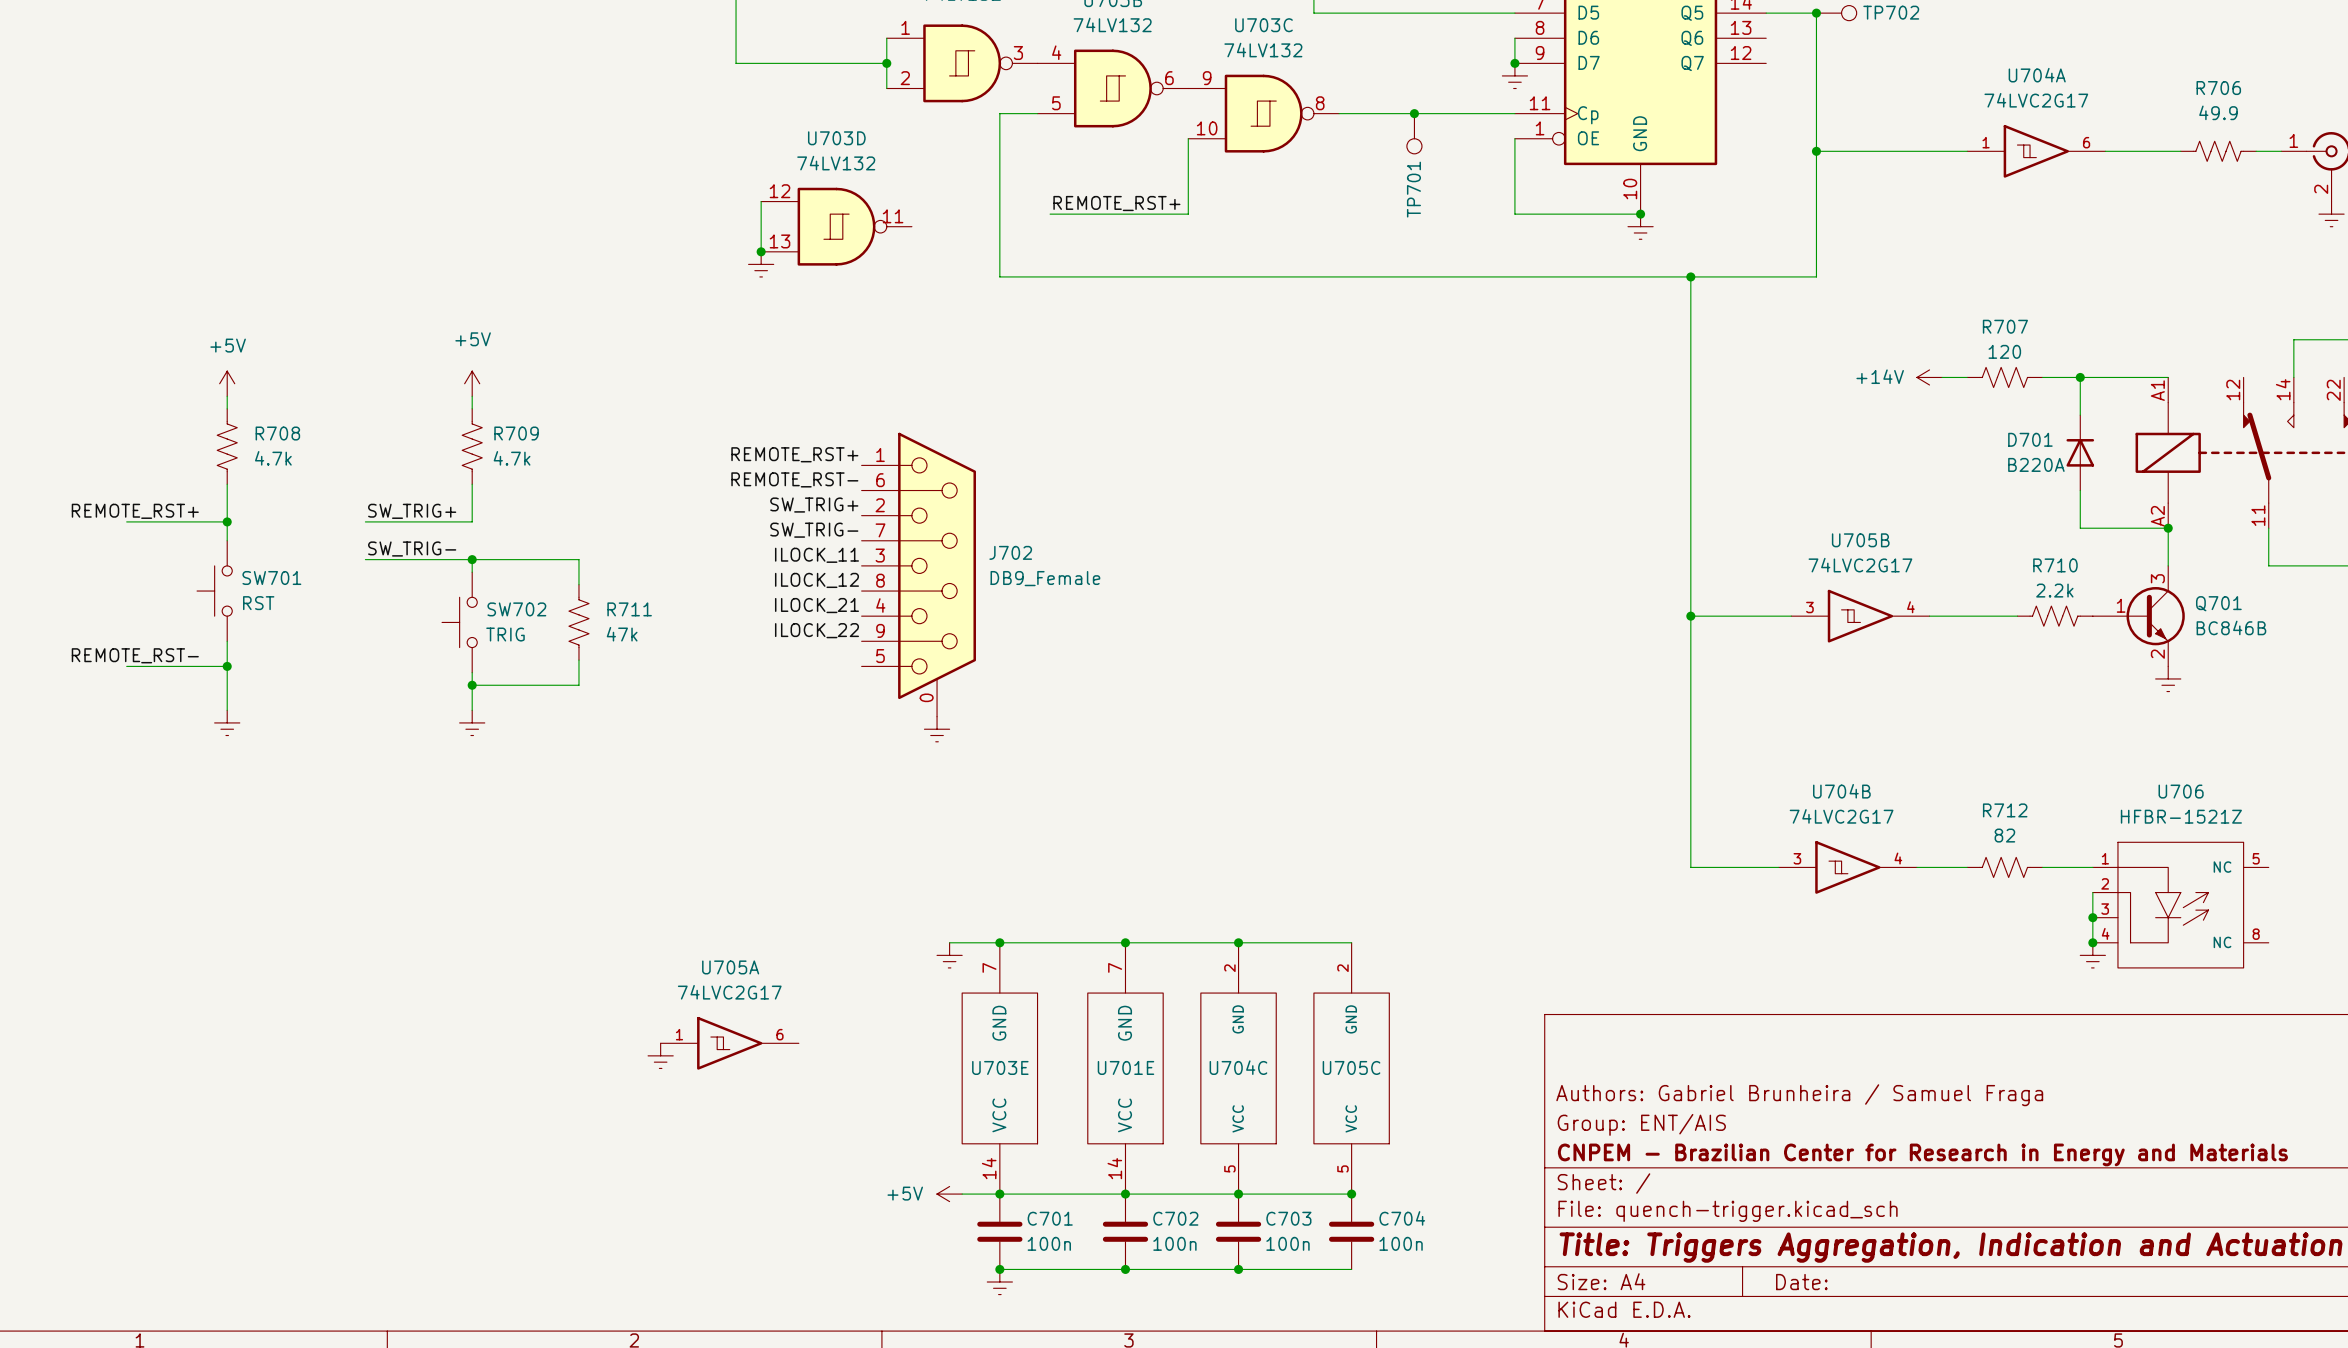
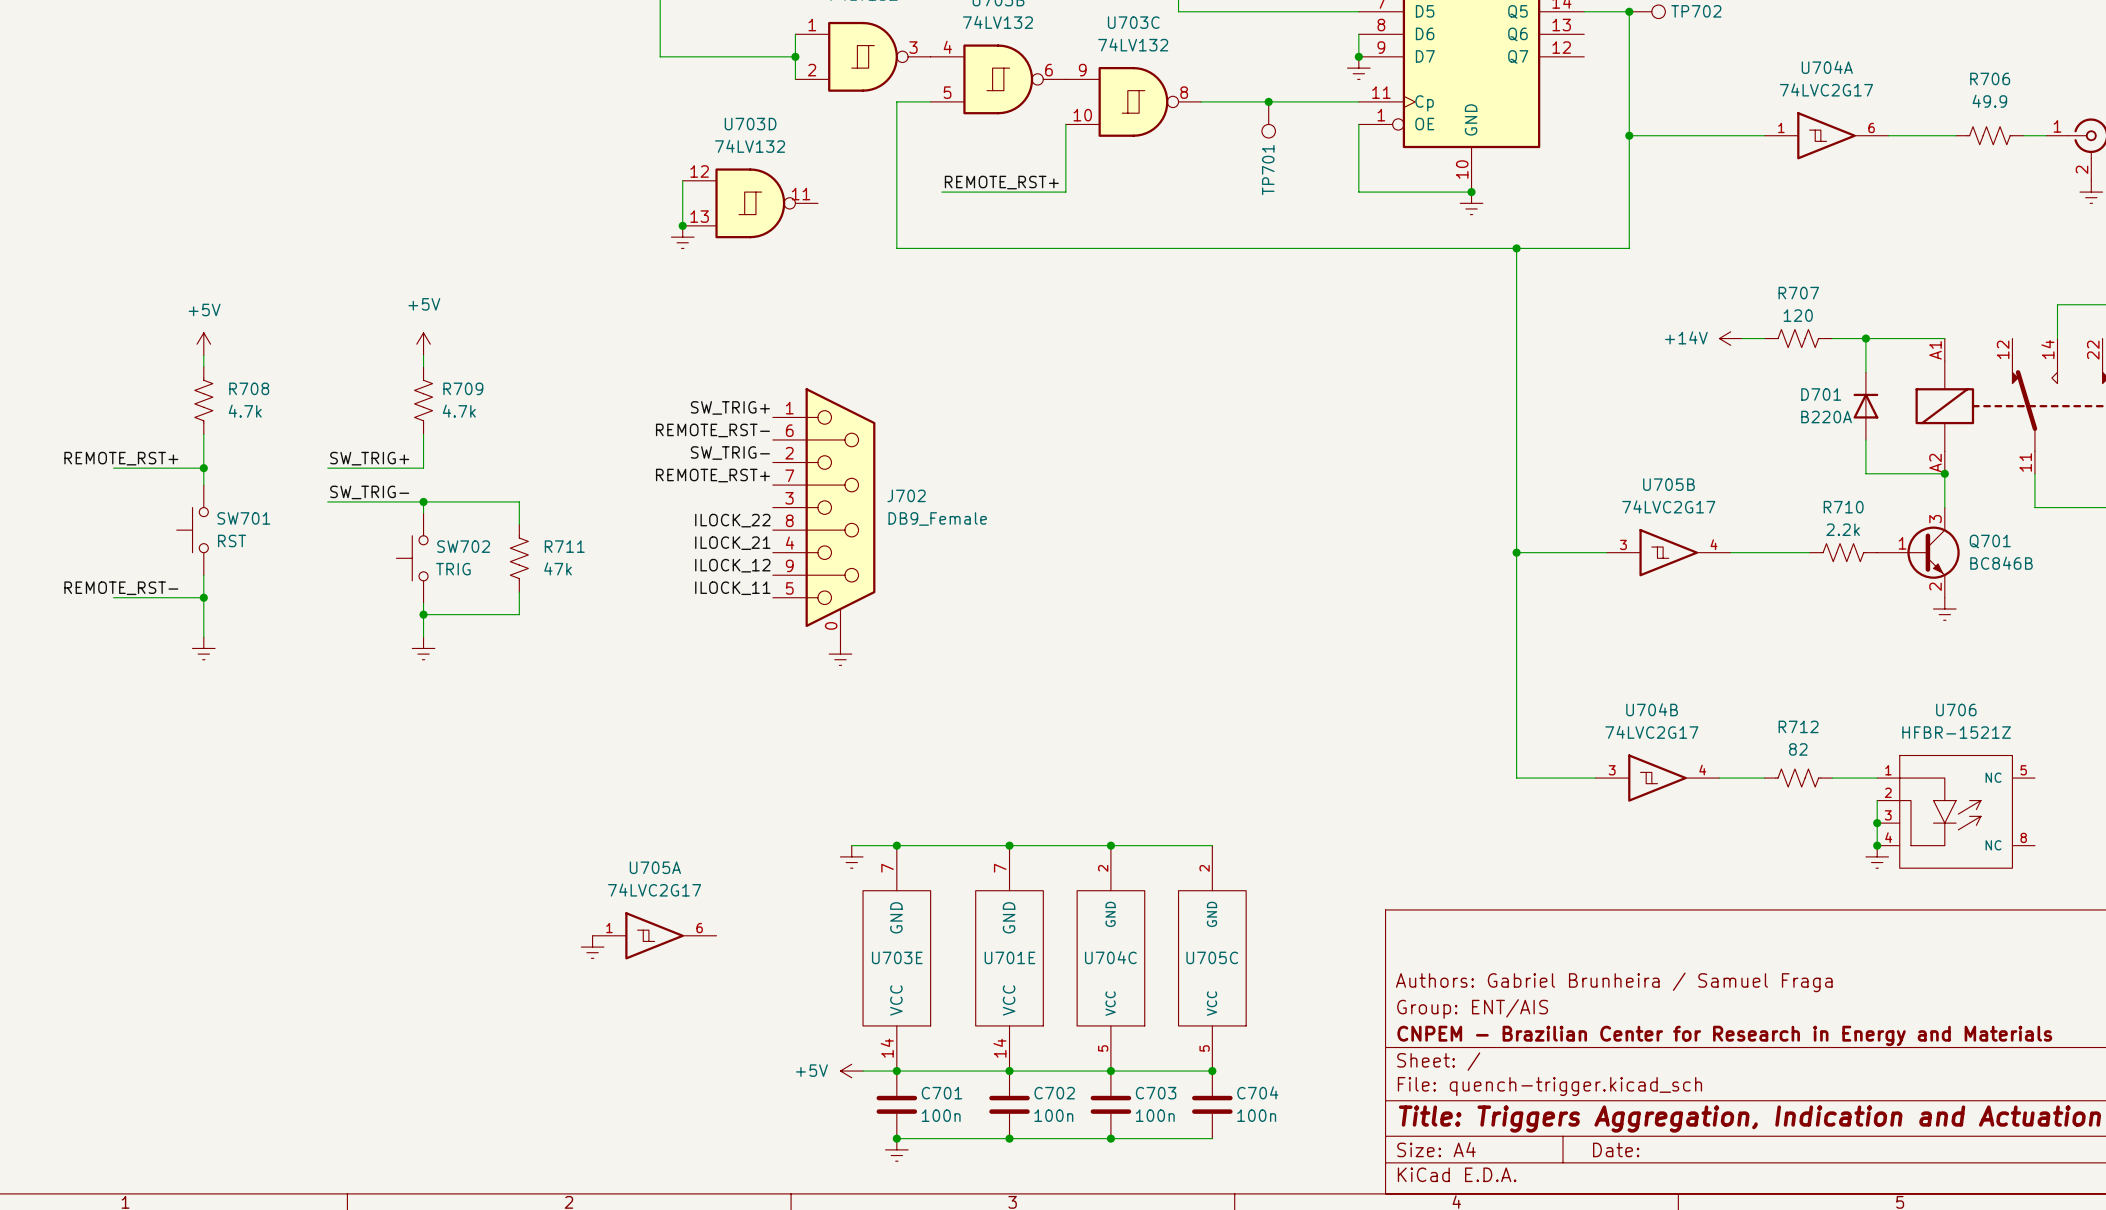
label: REMOTE_RST+ (794, 454) -> SW_TRIG+ (730, 407)
label: SW_TRIG+ (814, 505) -> SW_TRIG- (730, 453)
label: SW_TRIG- (814, 530) -> REMOTE_RST+ (712, 475)
label position: ILOCK_11 (816, 555) -> ILOCK_11 (732, 588)
label: ILOCK_12 (816, 580) -> ILOCK_22 (732, 520)
label: ILOCK_22 (816, 630) -> ILOCK_12 (732, 565)

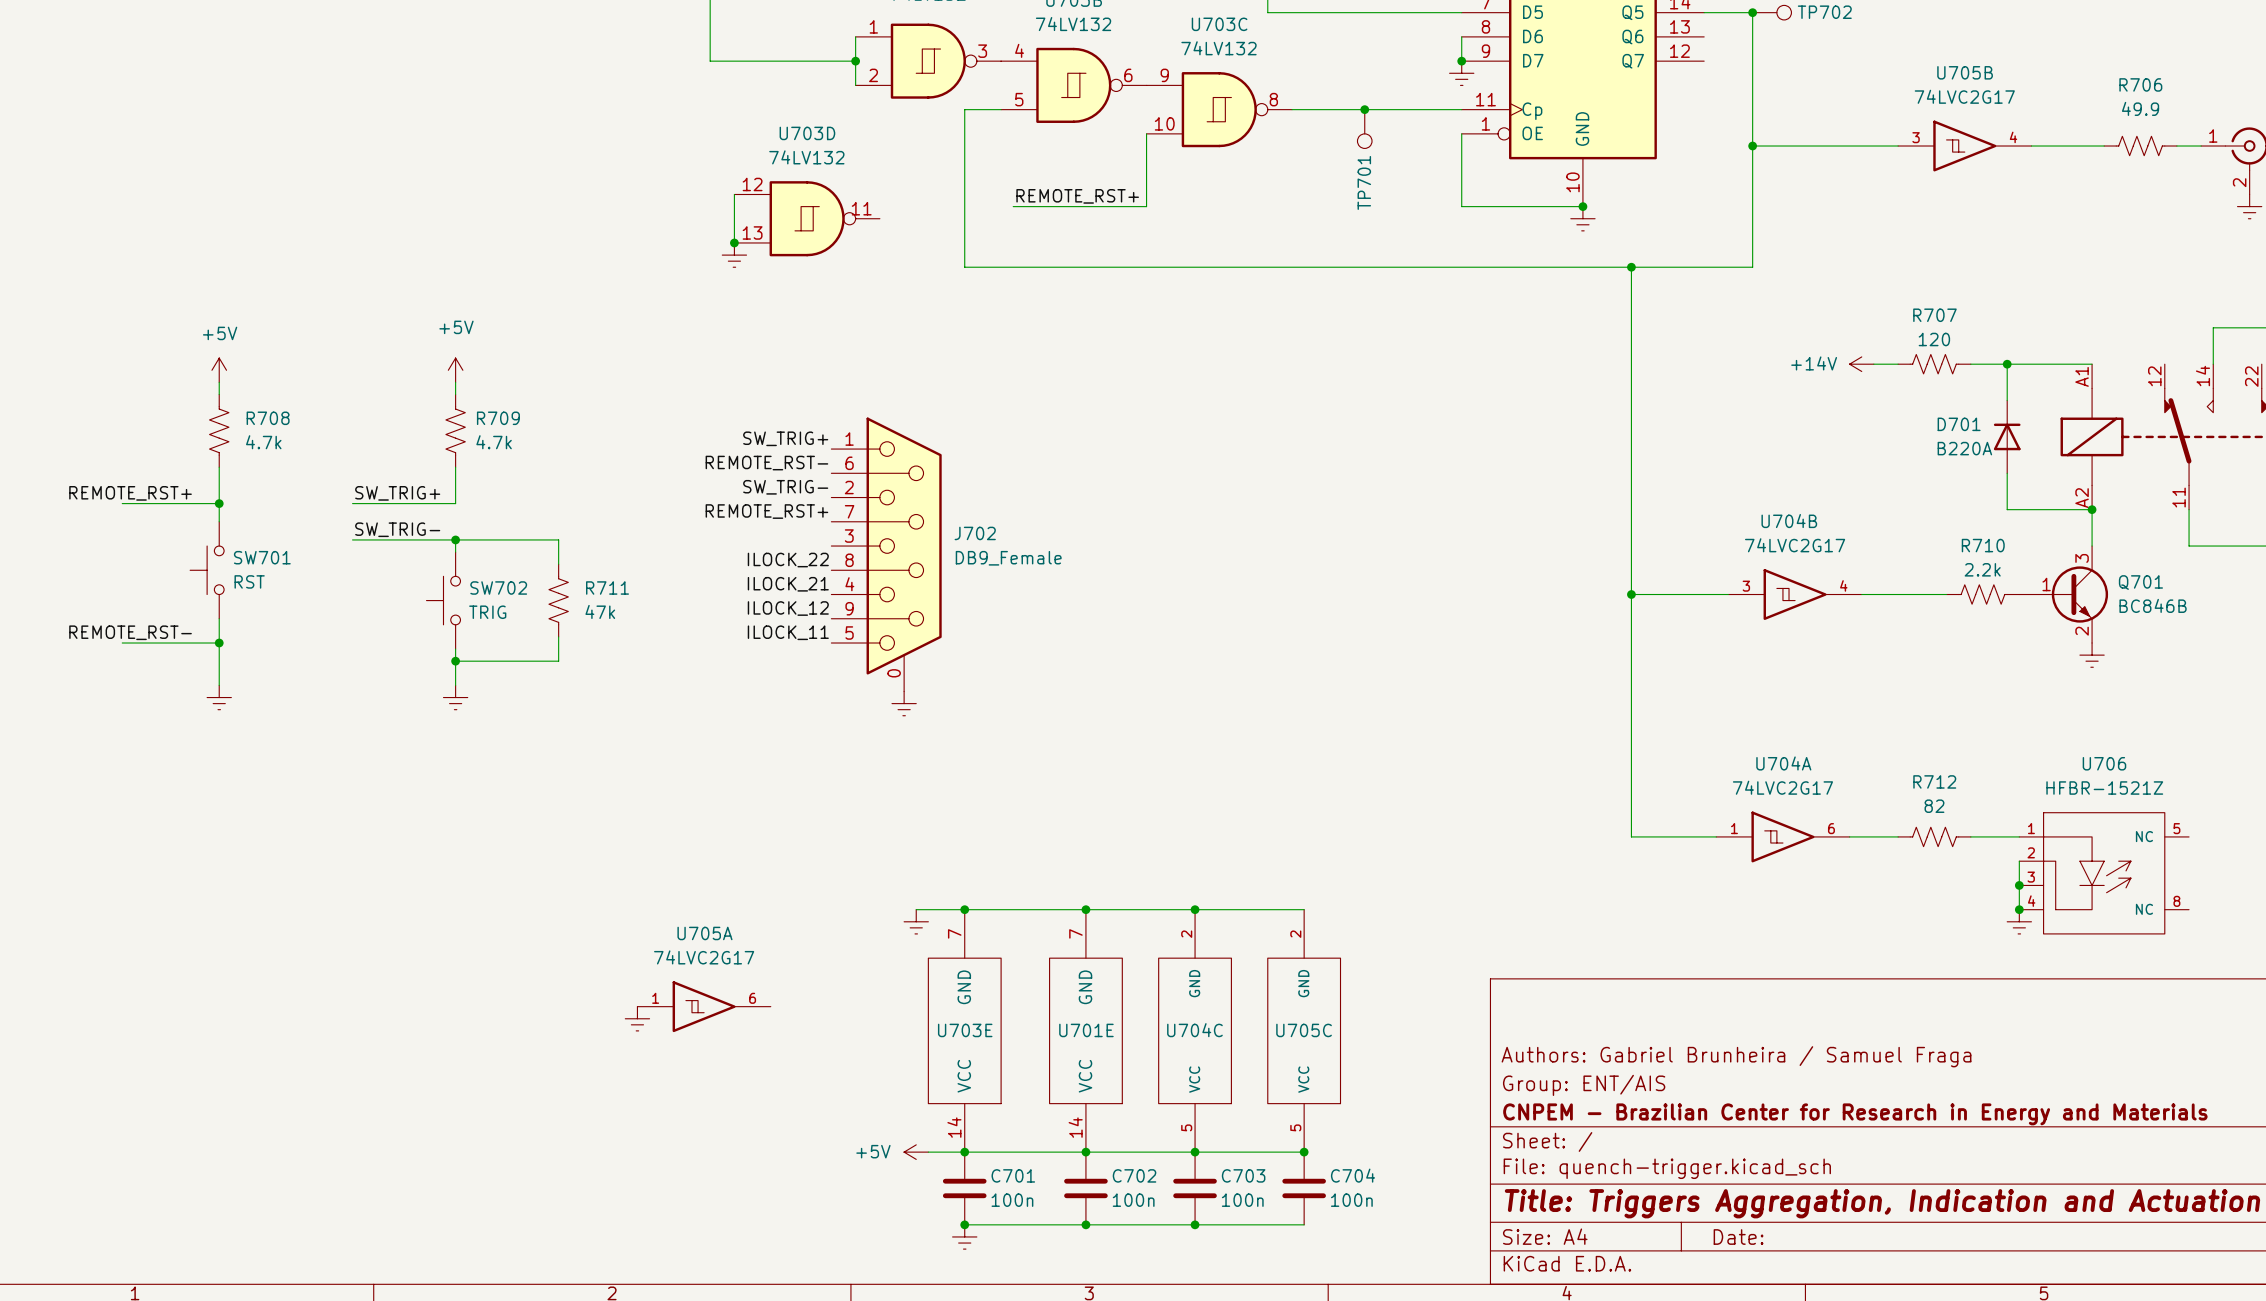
U704A position: (1826, 135) -> (1782, 836)
U705B: none -> 74LVC2G17 (1964, 146)
U705B name: U705B (1668, 484) -> U704B (1789, 521)
U704B: 74LVC2G17 (1657, 778) -> none

